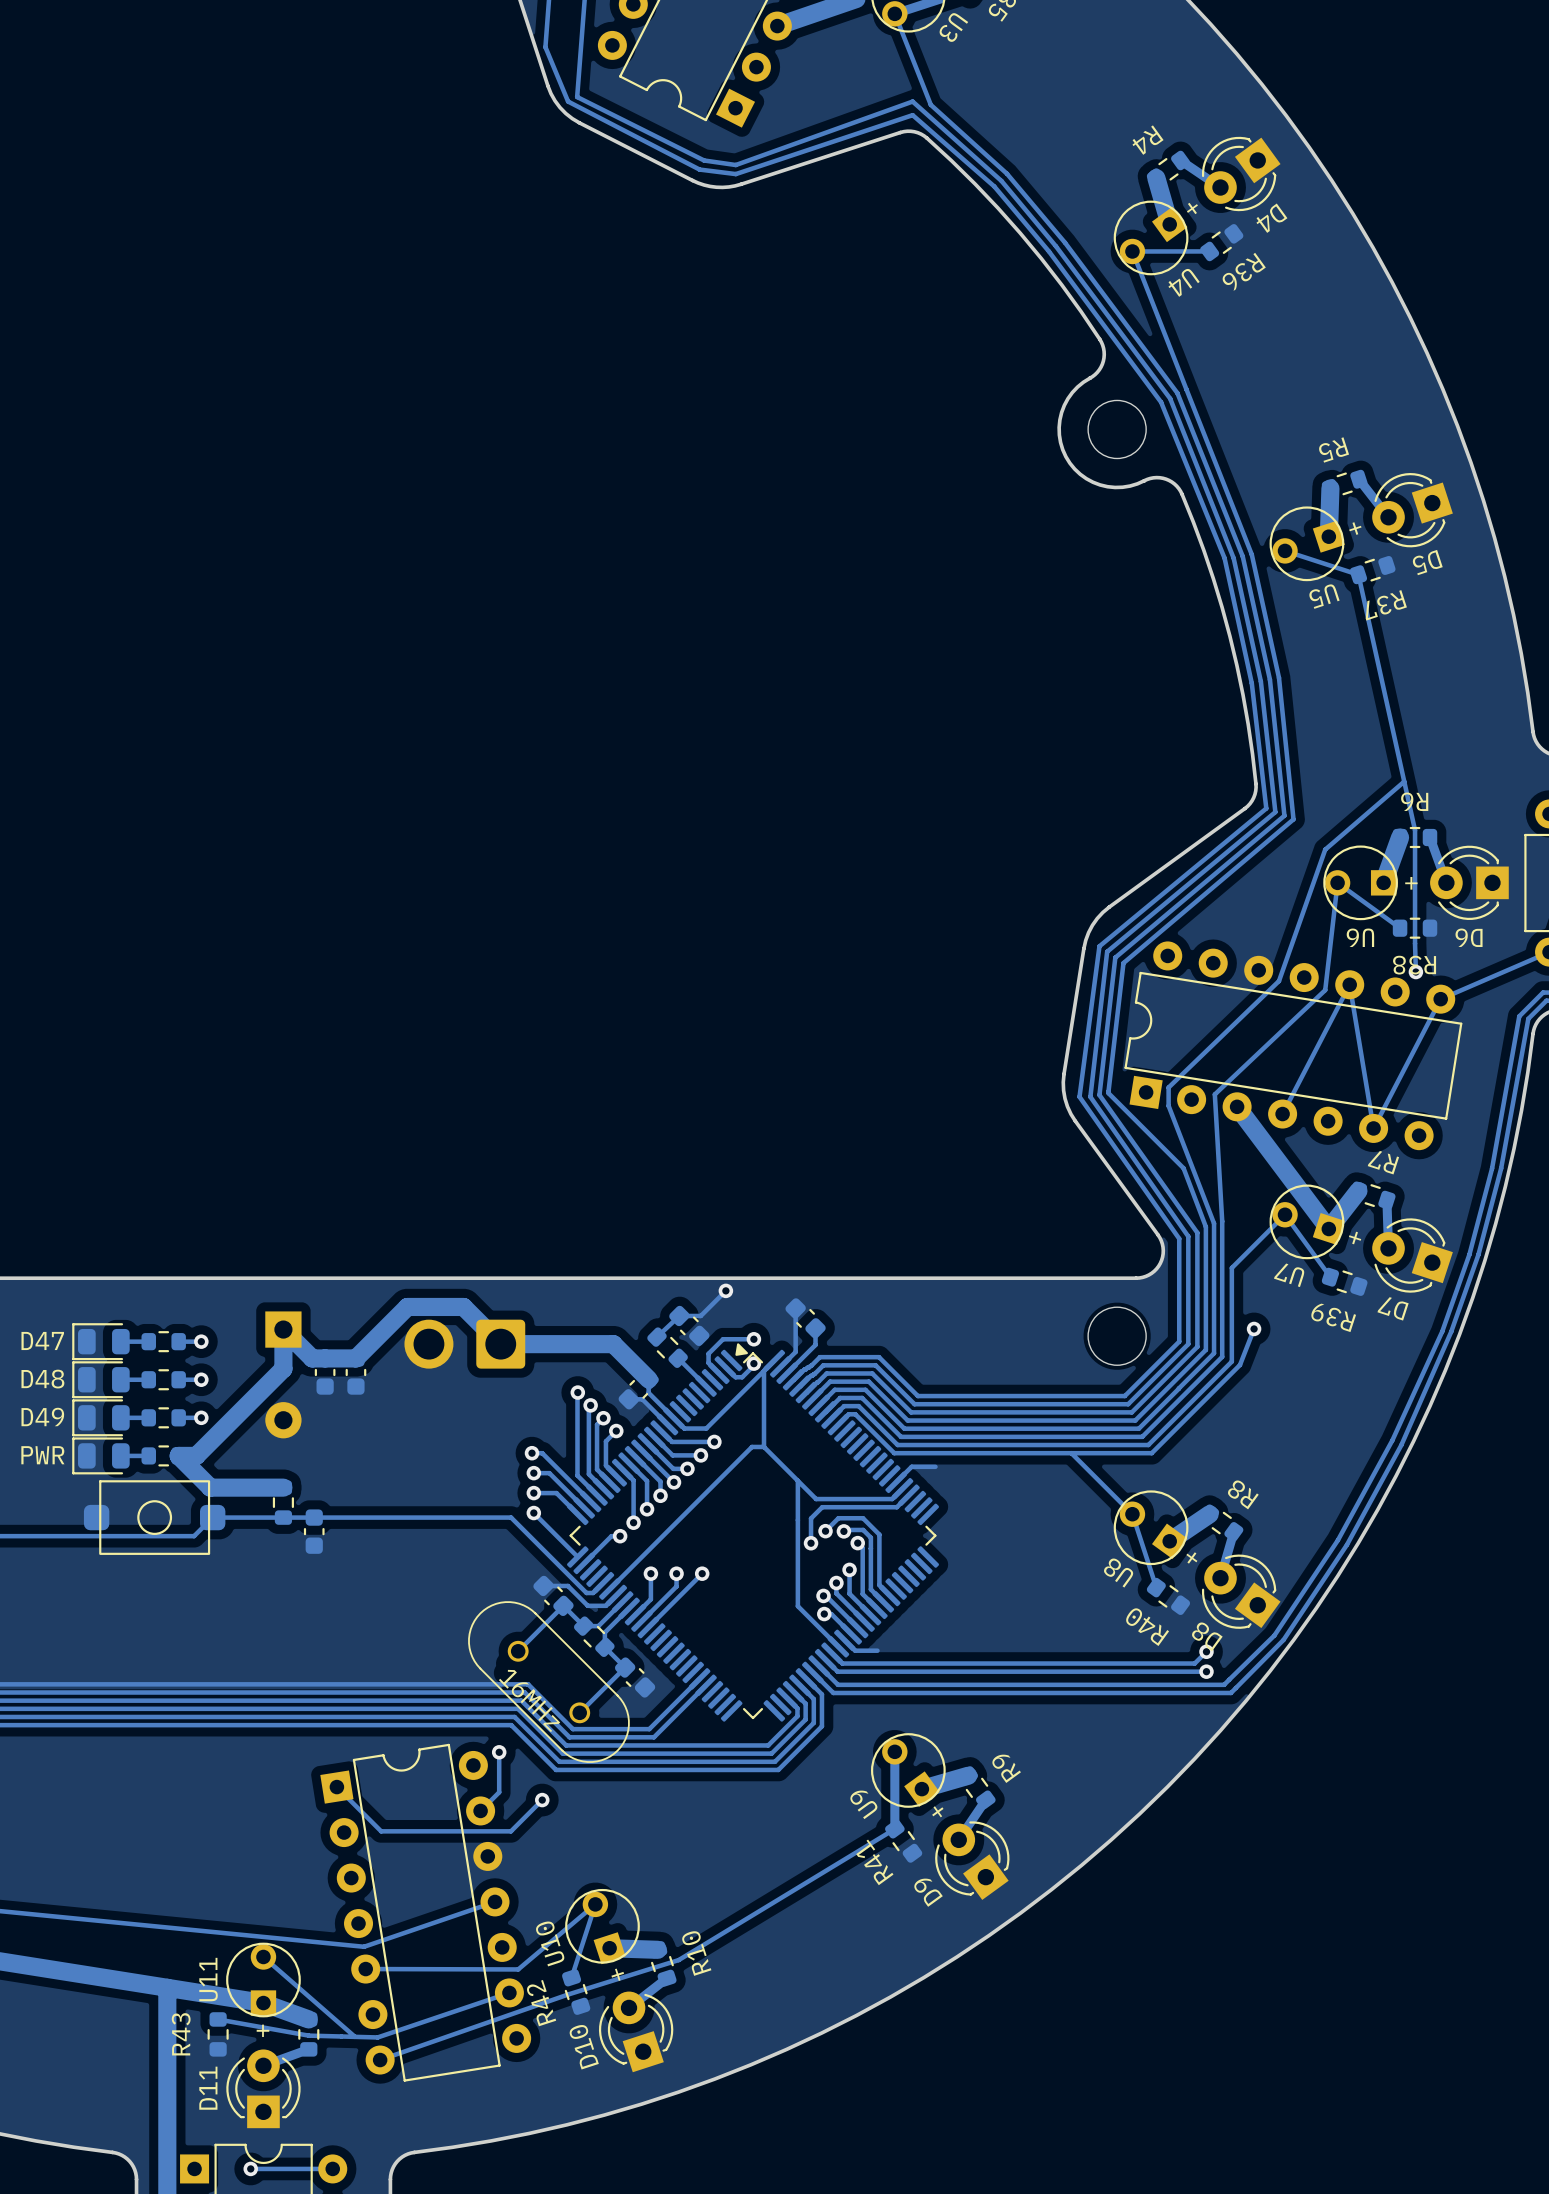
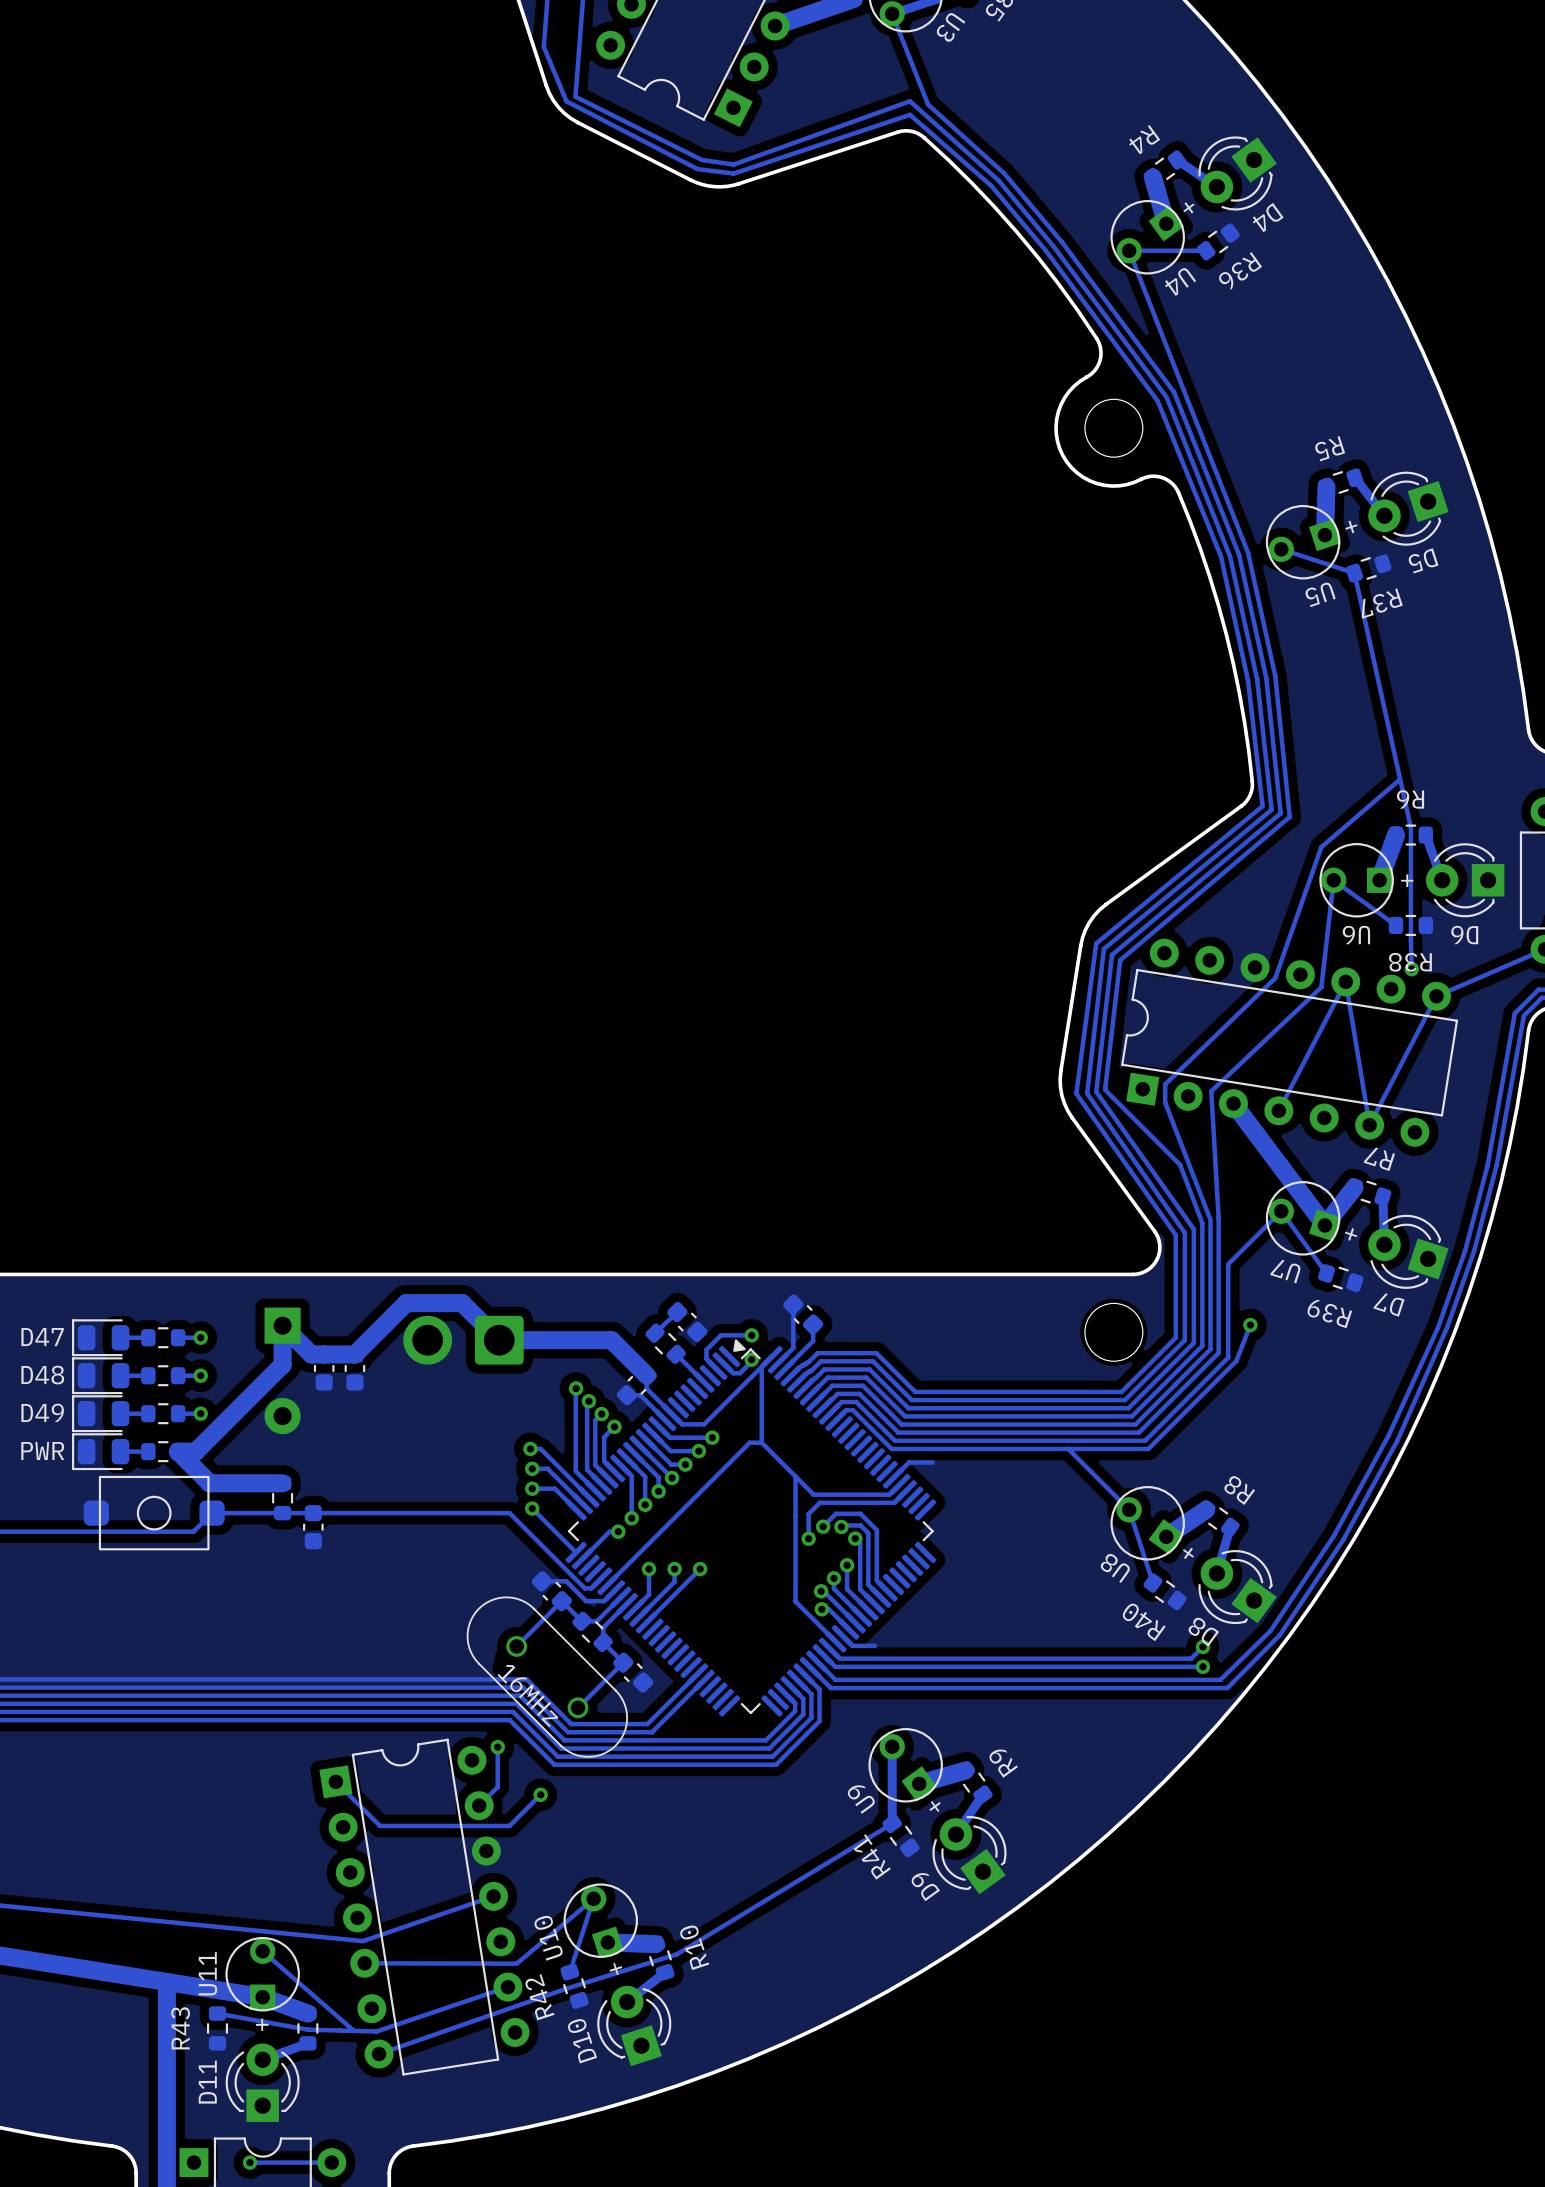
track: (725, 1290) (700, 1315) (679, 1315) -> none
via: (725, 1290) -> none

